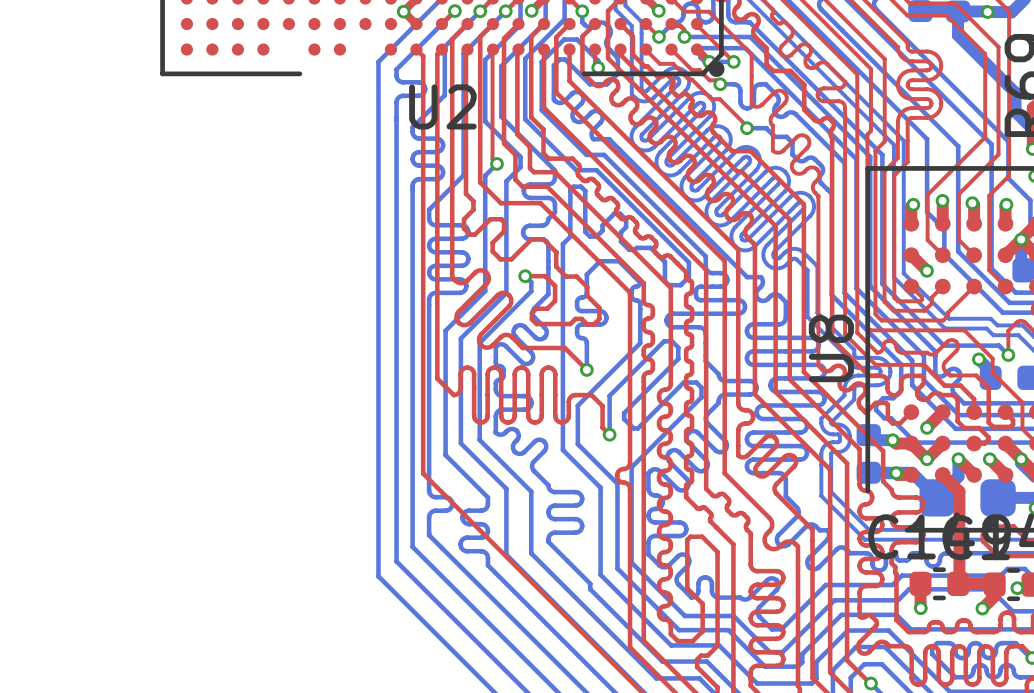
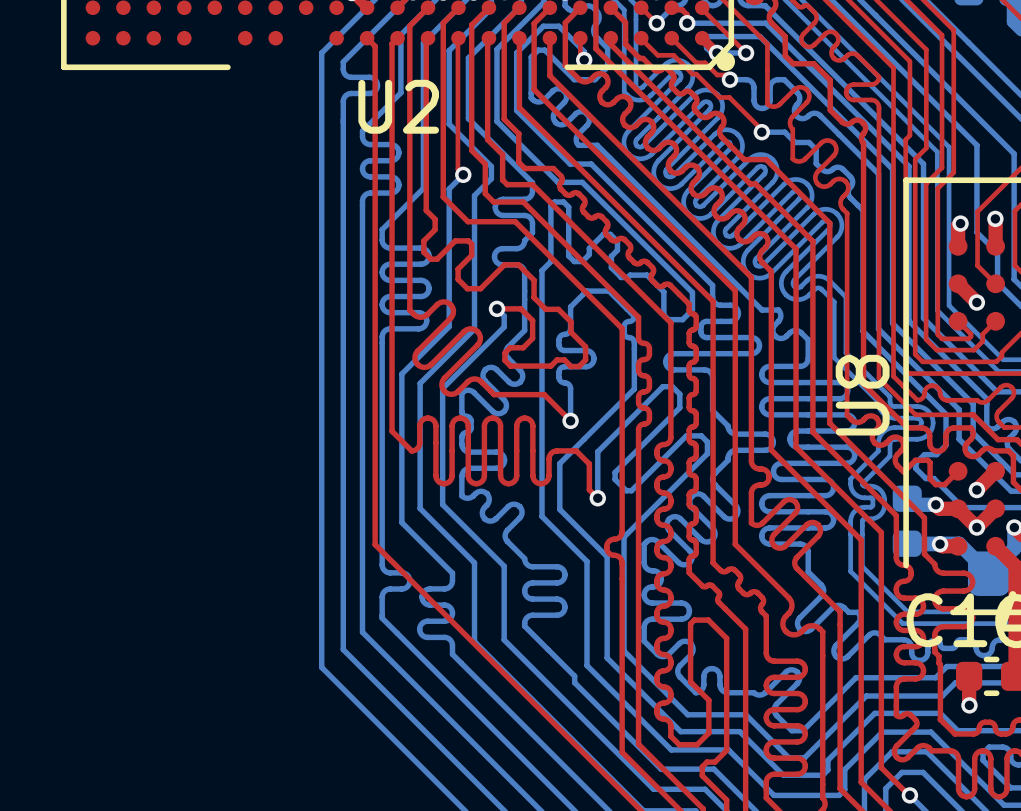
top track: (897, 47) (899, 53) (904, 59) (928, 61) (931, 65) (928, 70) (907, 71) (900, 77) (898, 87) (903, 95) (910, 98) (928, 99) (931, 103) (928, 107) (904, 110) (899, 116) (897, 122) -> (942, 35) (942, 125)
top track: (907, 47) (911, 51) (934, 53) (939, 59) (941, 65) (939, 72) (934, 78) (911, 80) (907, 84) (911, 89) (928, 89) (935, 92) (940, 100) (939, 111) (931, 117) (911, 118) (907, 122) -> (953, 35) (953, 125)

